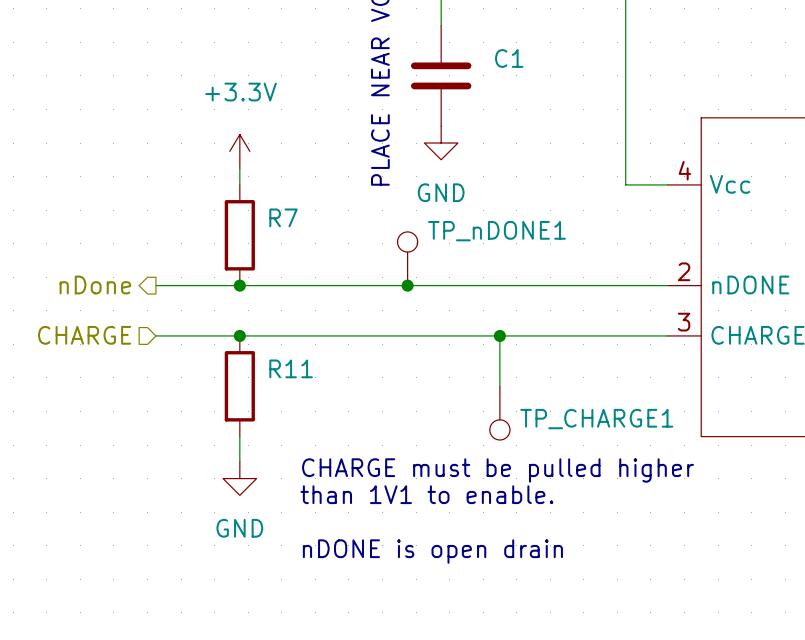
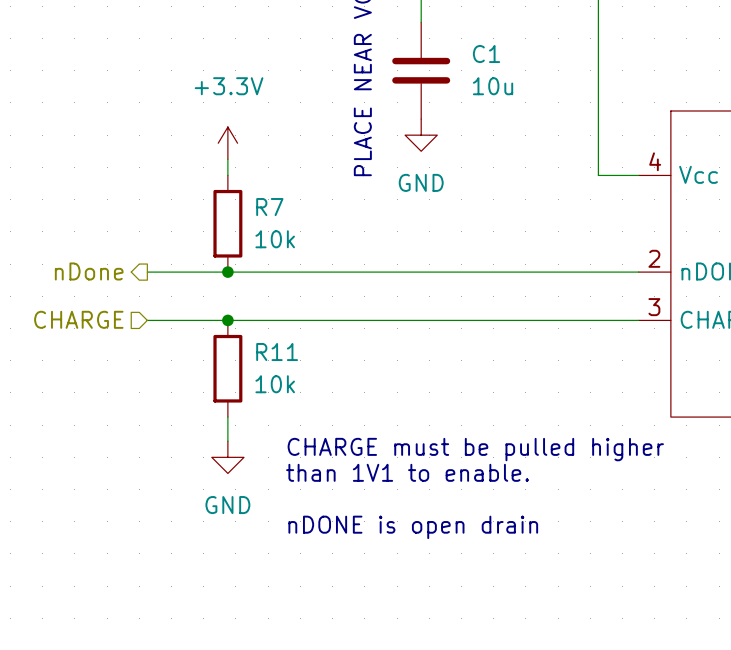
C1 value: none -> 10u (493, 86)
R7 value: none -> 10k (275, 239)
TP_nDONE1: (407, 258) -> none
junction: (407, 285) -> none
wire: (499, 335) (499, 386) -> none
junction: (499, 335) -> none
R11 value: none -> 10k (275, 384)
TP_CHARGE1: (499, 413) -> none

